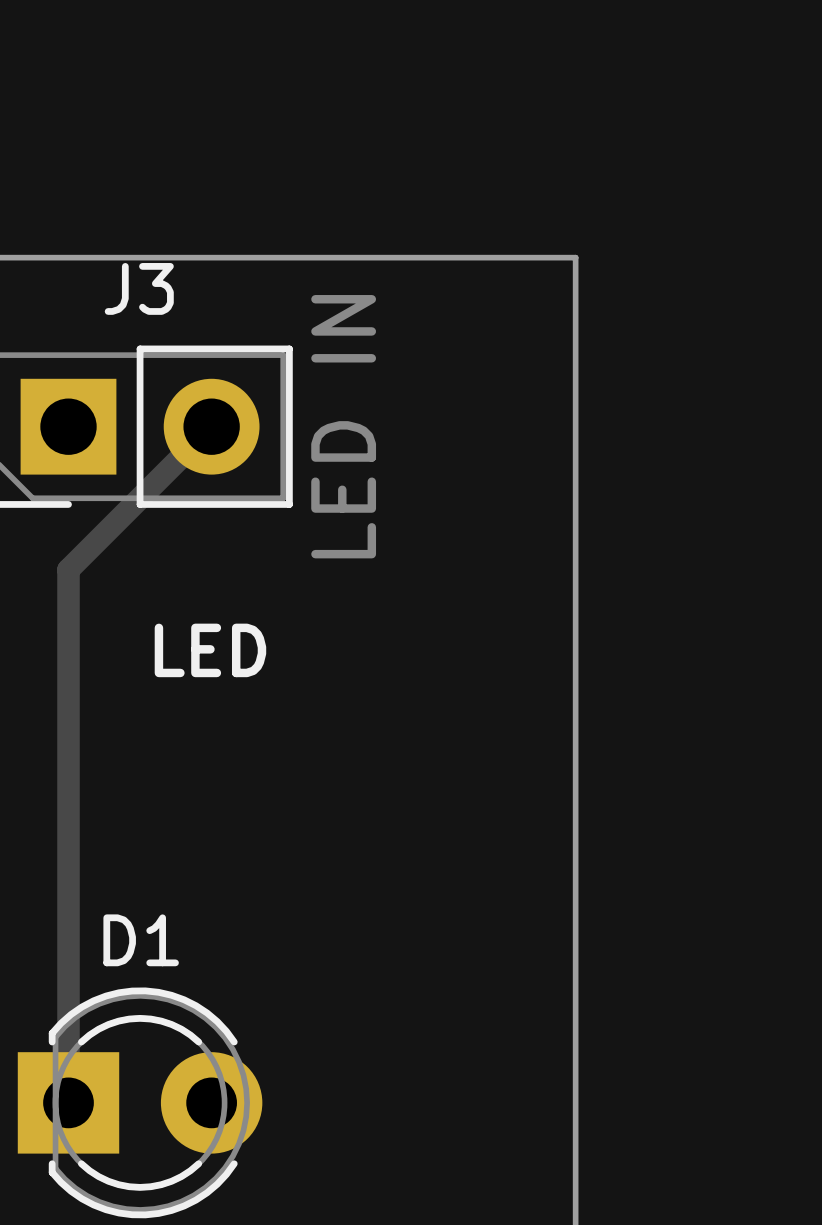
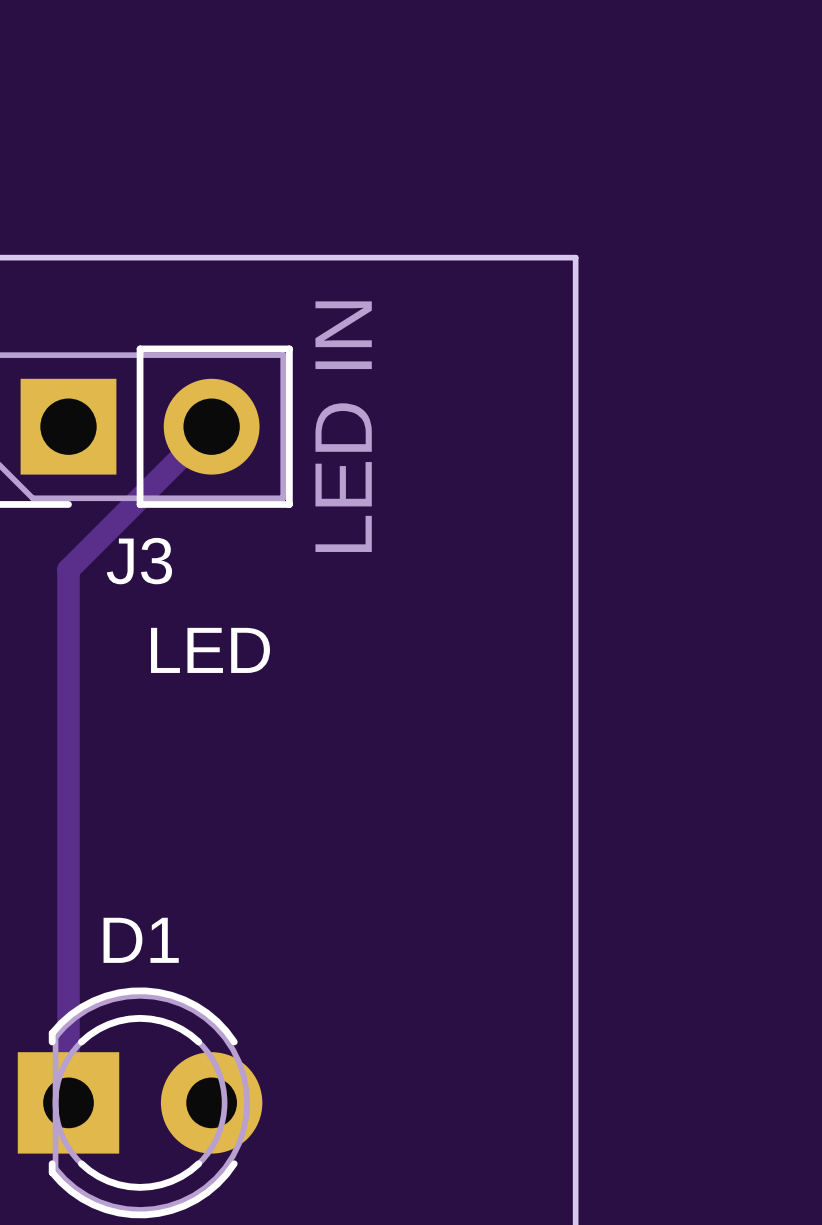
J3 name position: J3 (139, 288) -> J3 (139, 561)

